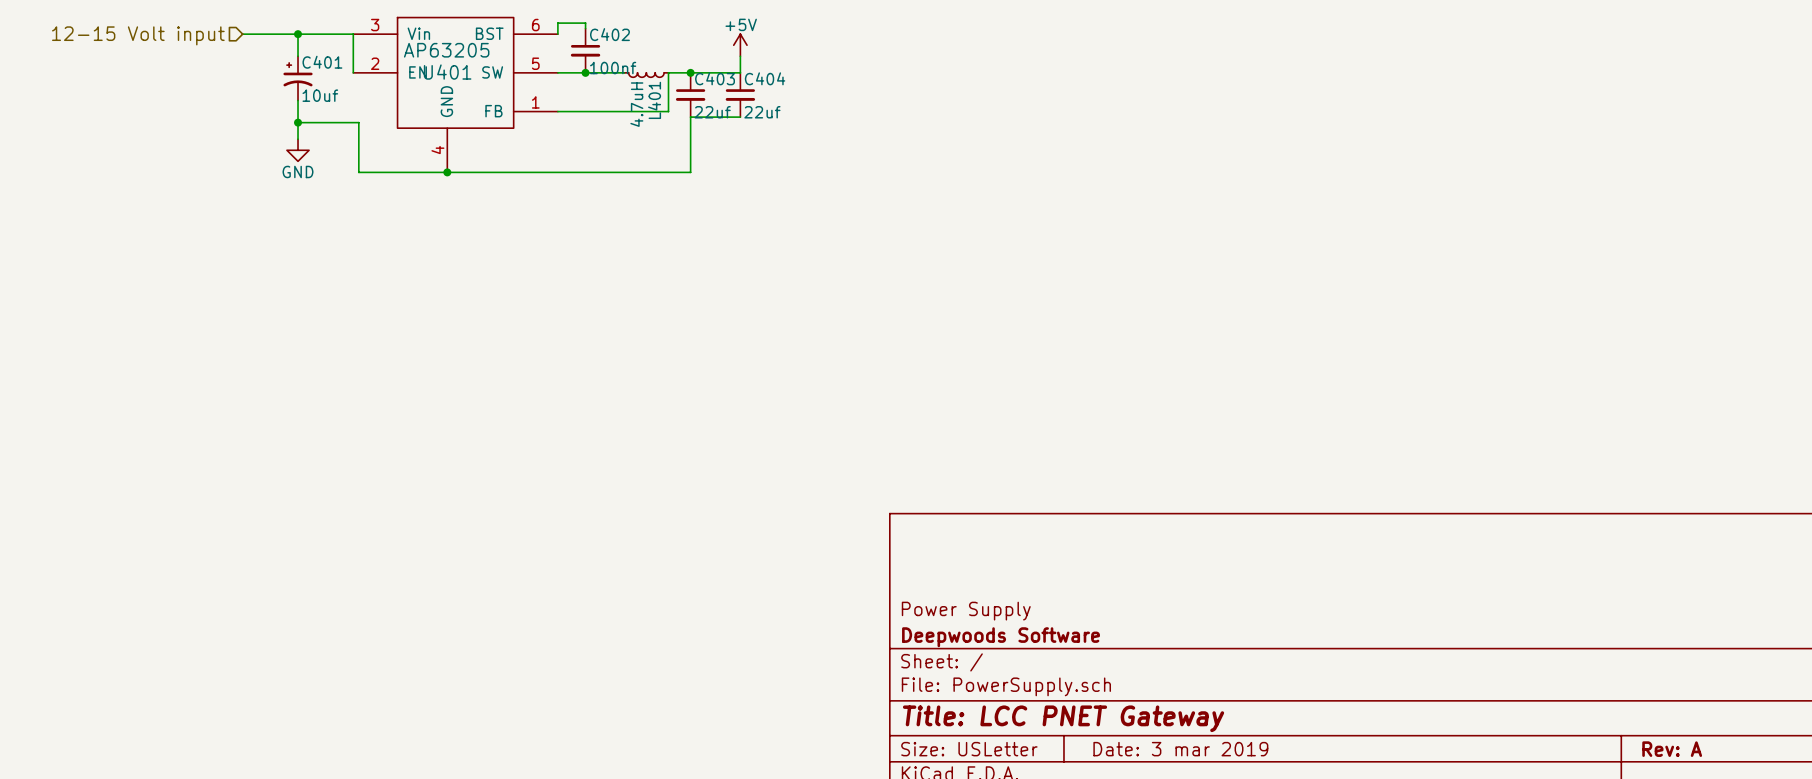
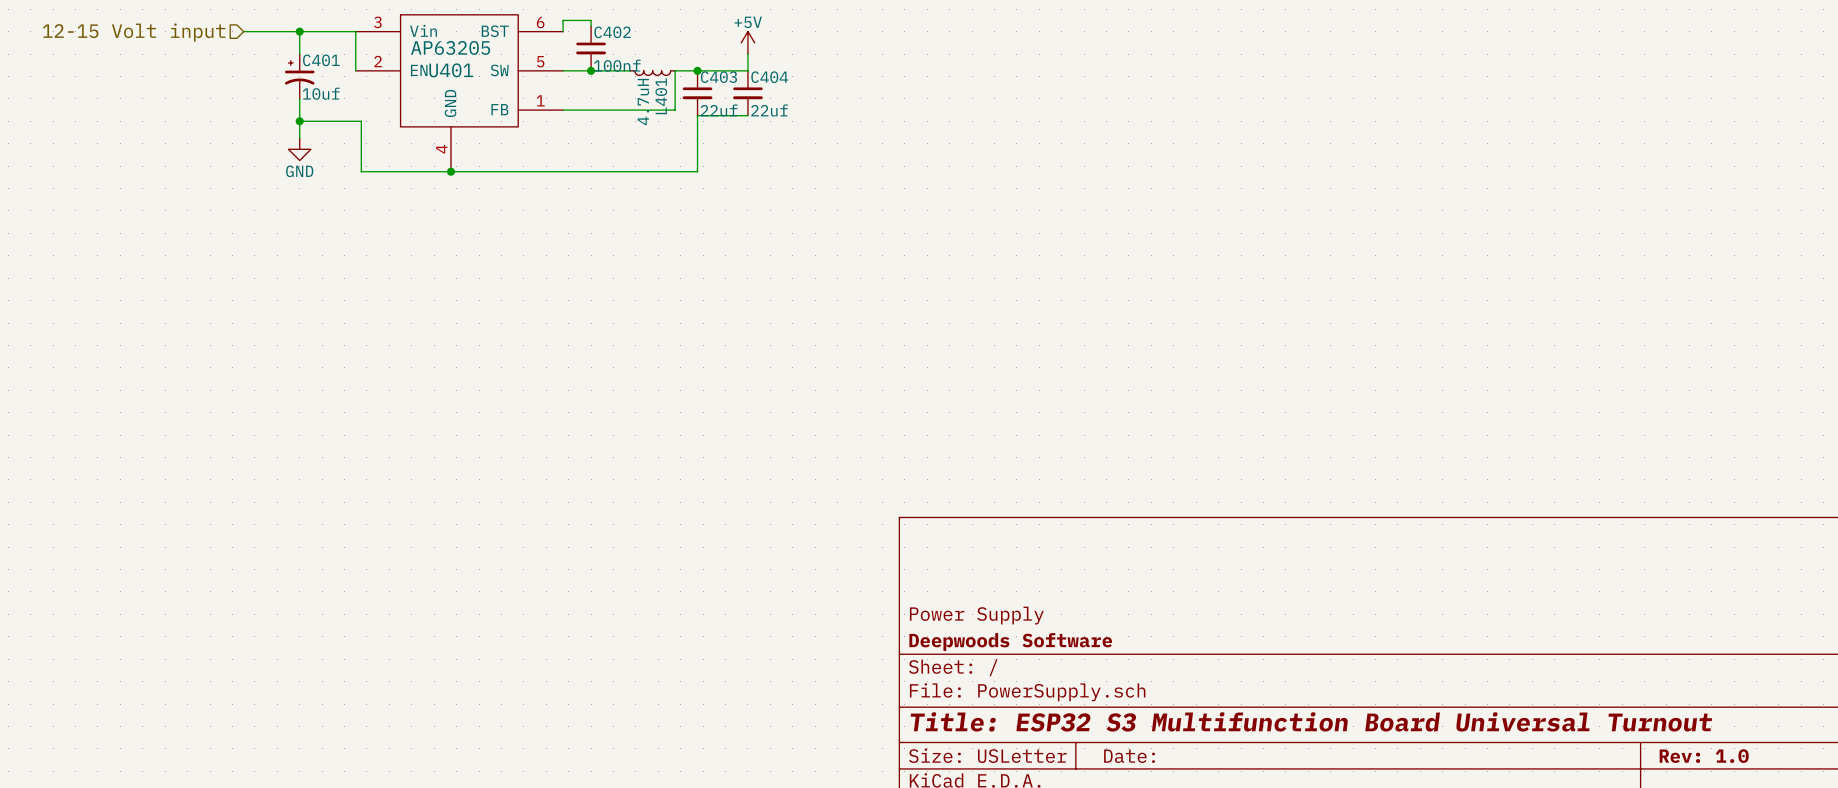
title block: Title: LCC PNET Gateway (1063, 718) -> Title: ESP32 S3 Multifunction Board Universal Turnout (1311, 721)
title block: Date: 3 mar 2019 (1180, 749) -> Date: (1129, 756)
title block: Rev: A (1672, 749) -> Rev: 1.0 (1704, 756)

